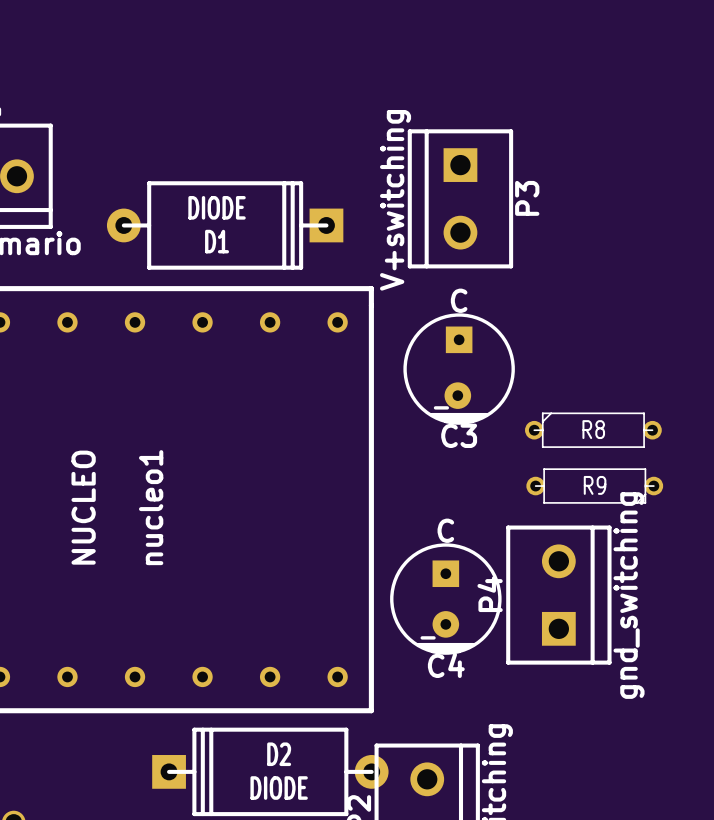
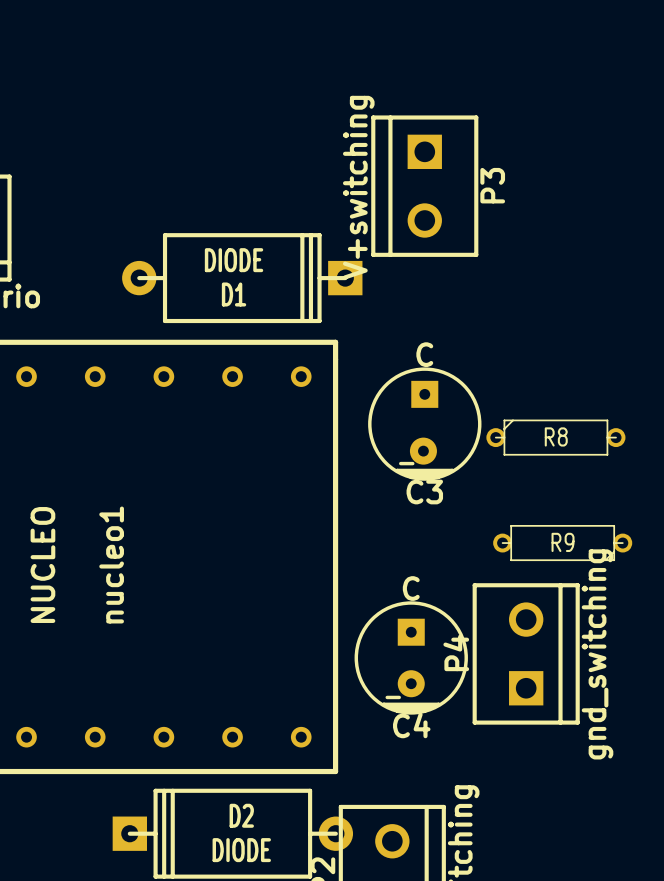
P3 position: (460, 198) -> (424, 186)
D1 position: (225, 225) -> (242, 278)
R8 position: (593, 430) -> (555, 437)

